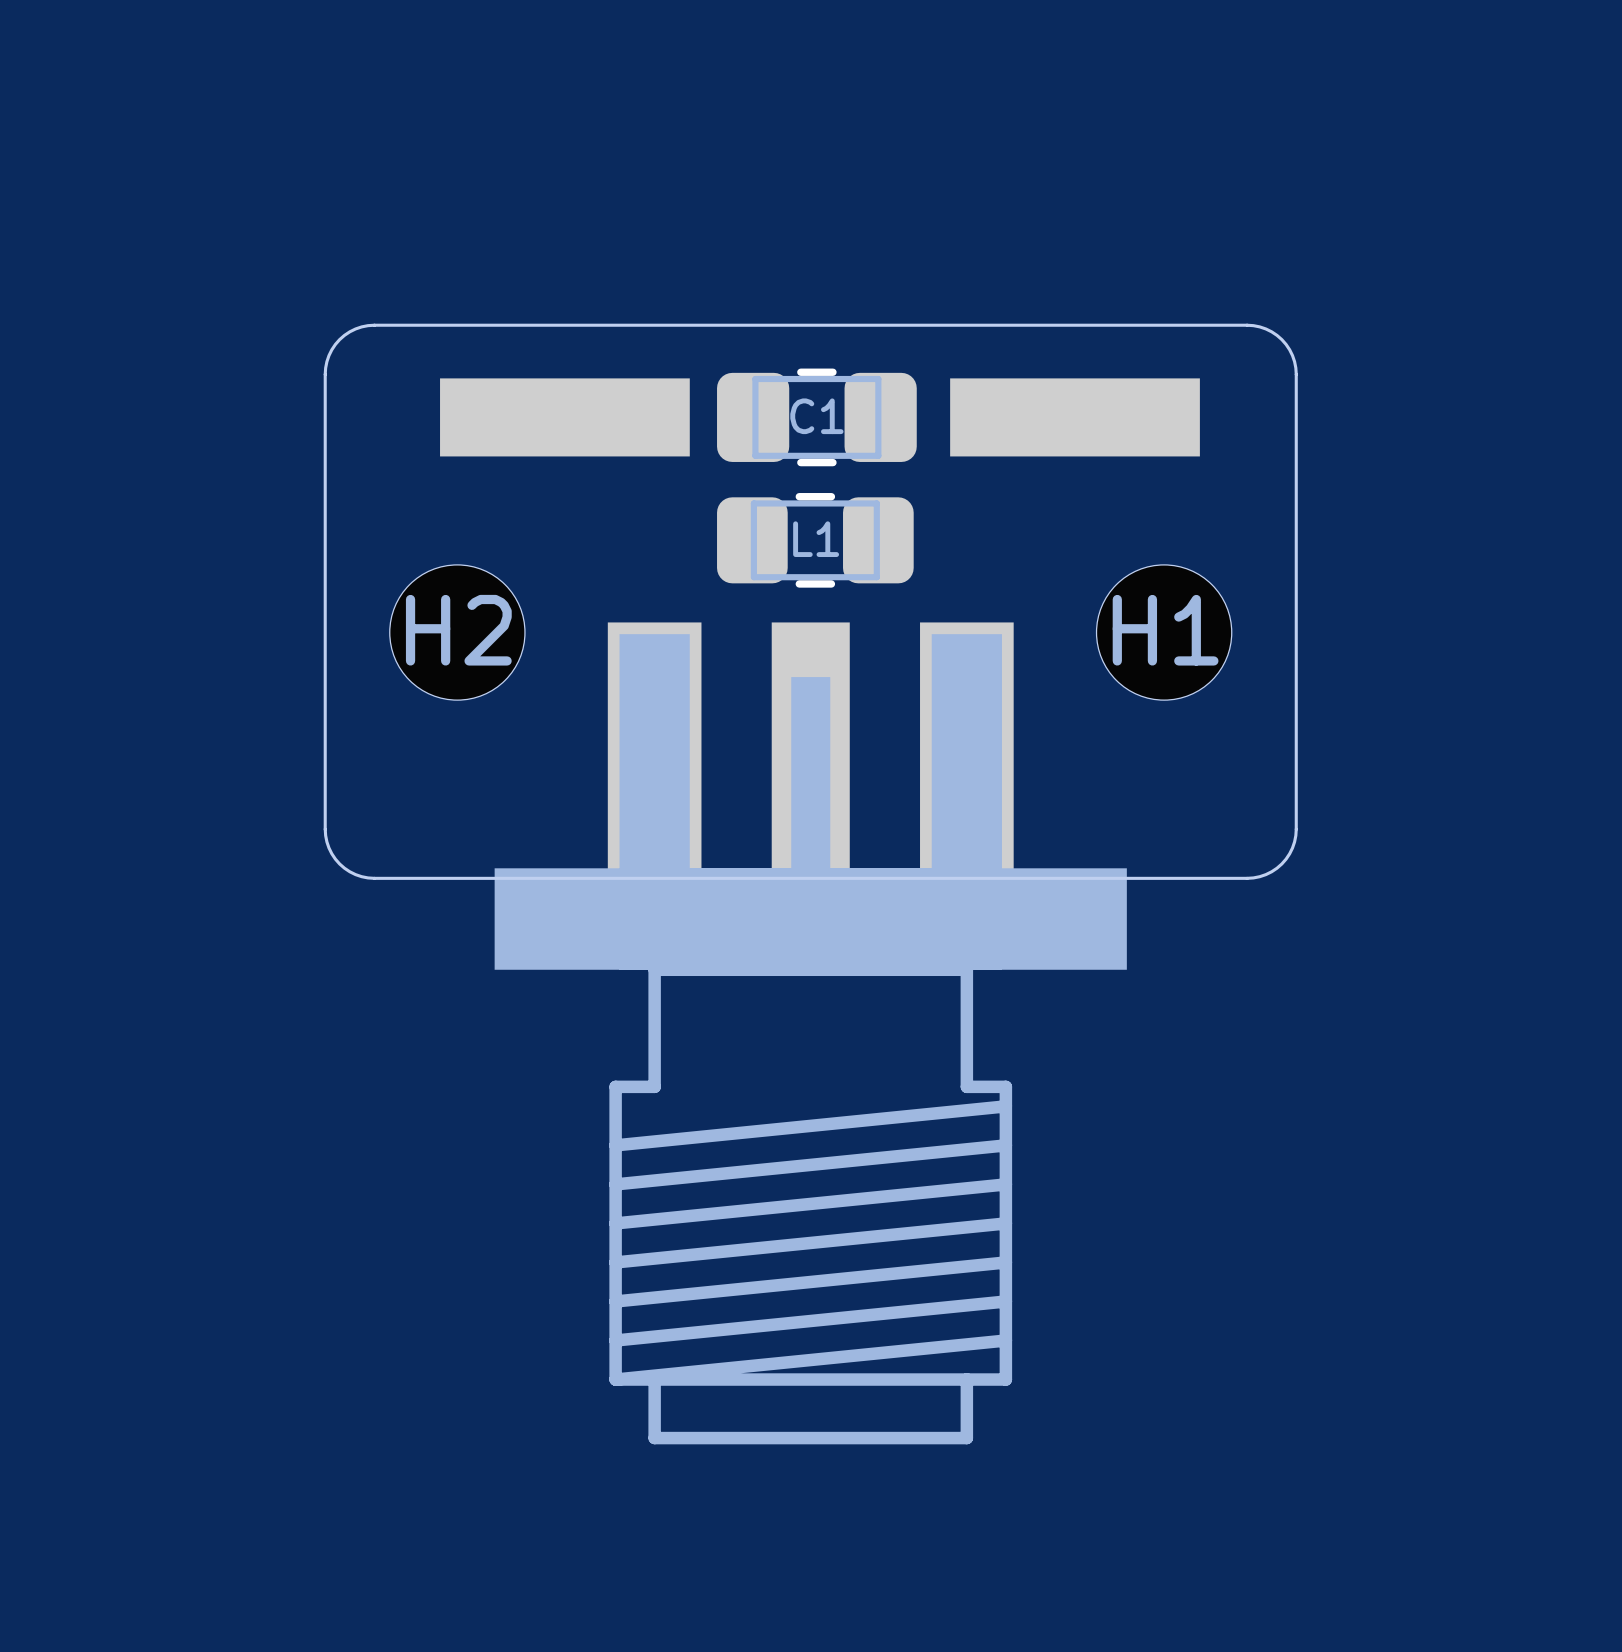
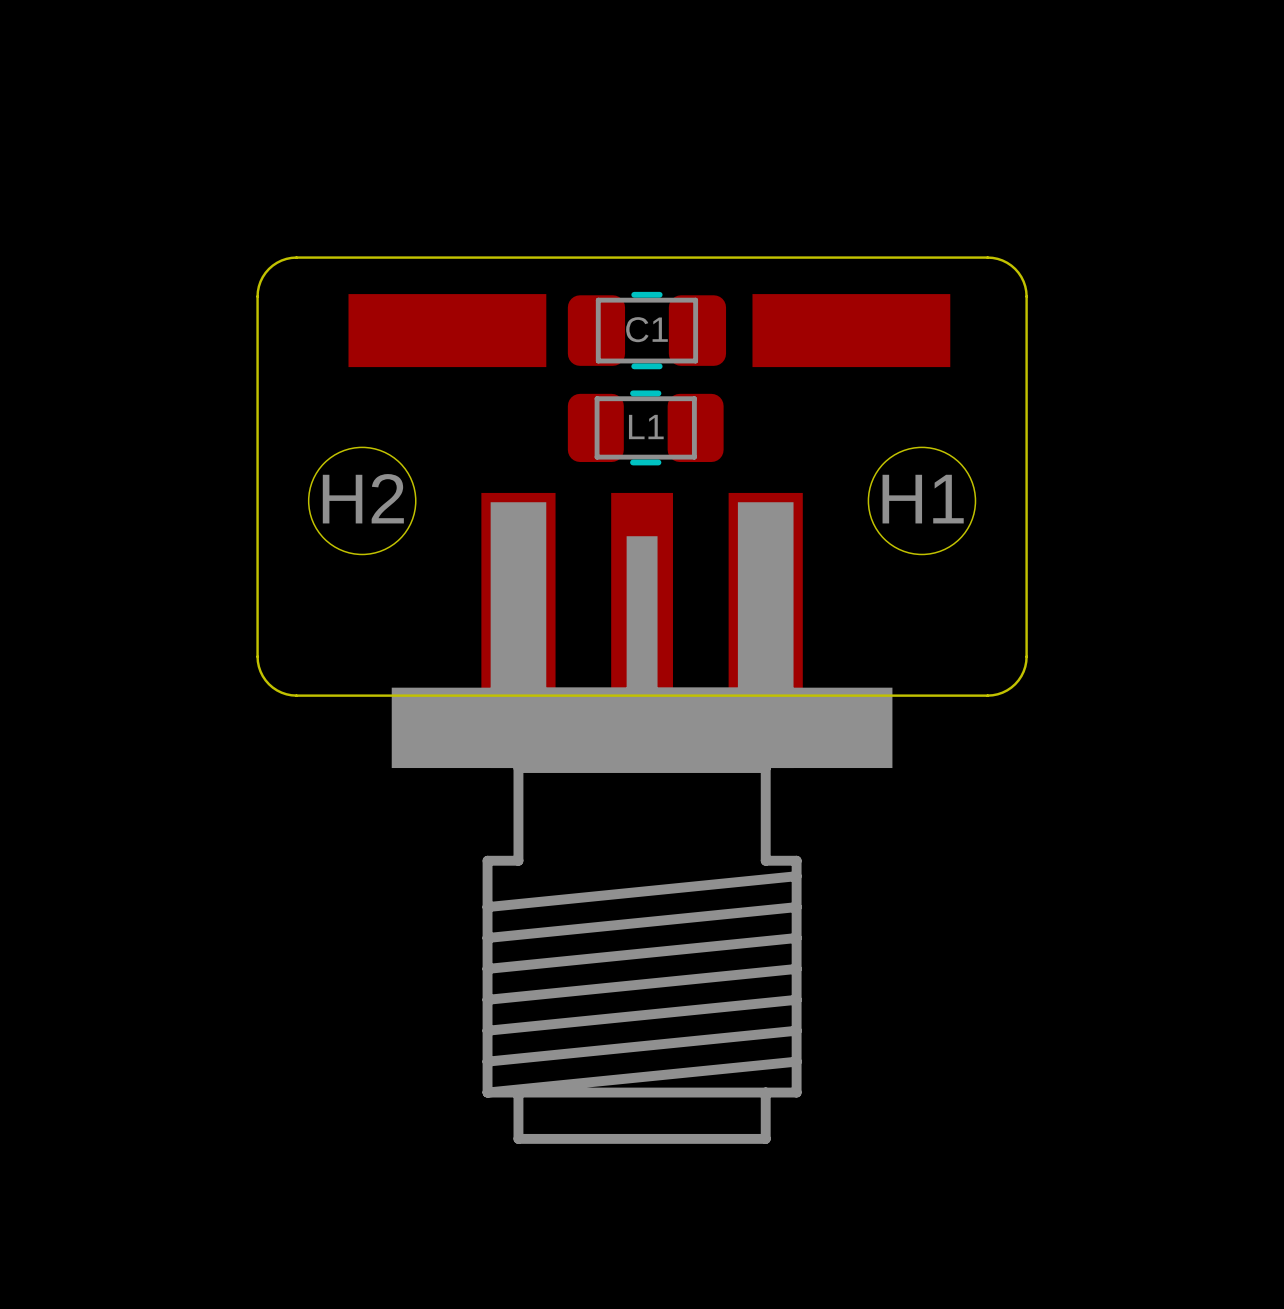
part footprint: [440, 378, 690, 457] -> [348, 294, 547, 368]
part footprint: [950, 378, 1200, 457] -> [752, 294, 951, 368]

